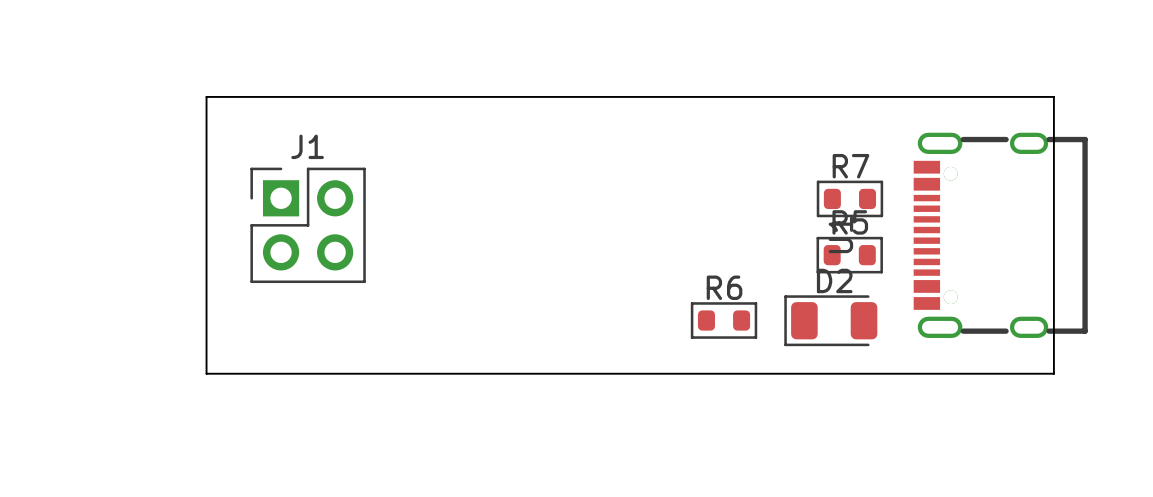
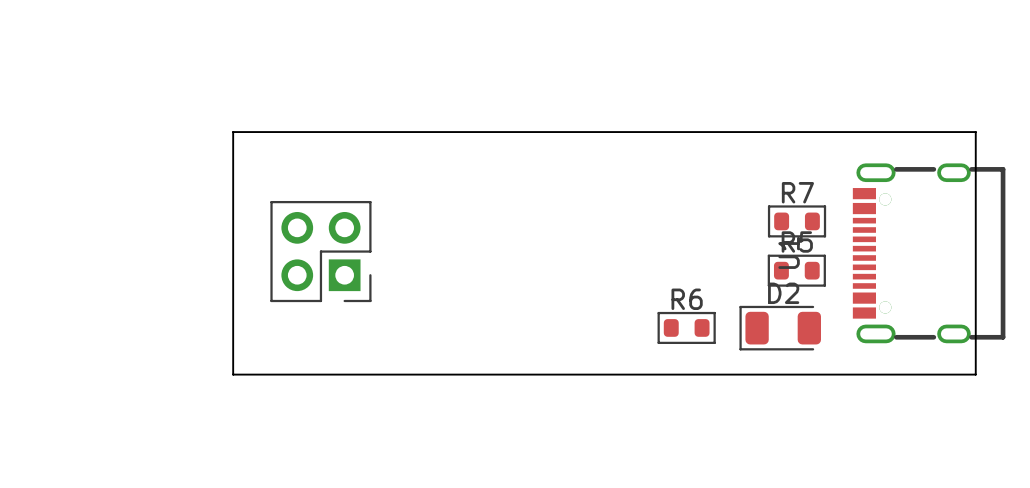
J1: (308, 225) -> none
part: none -> (320, 251)

